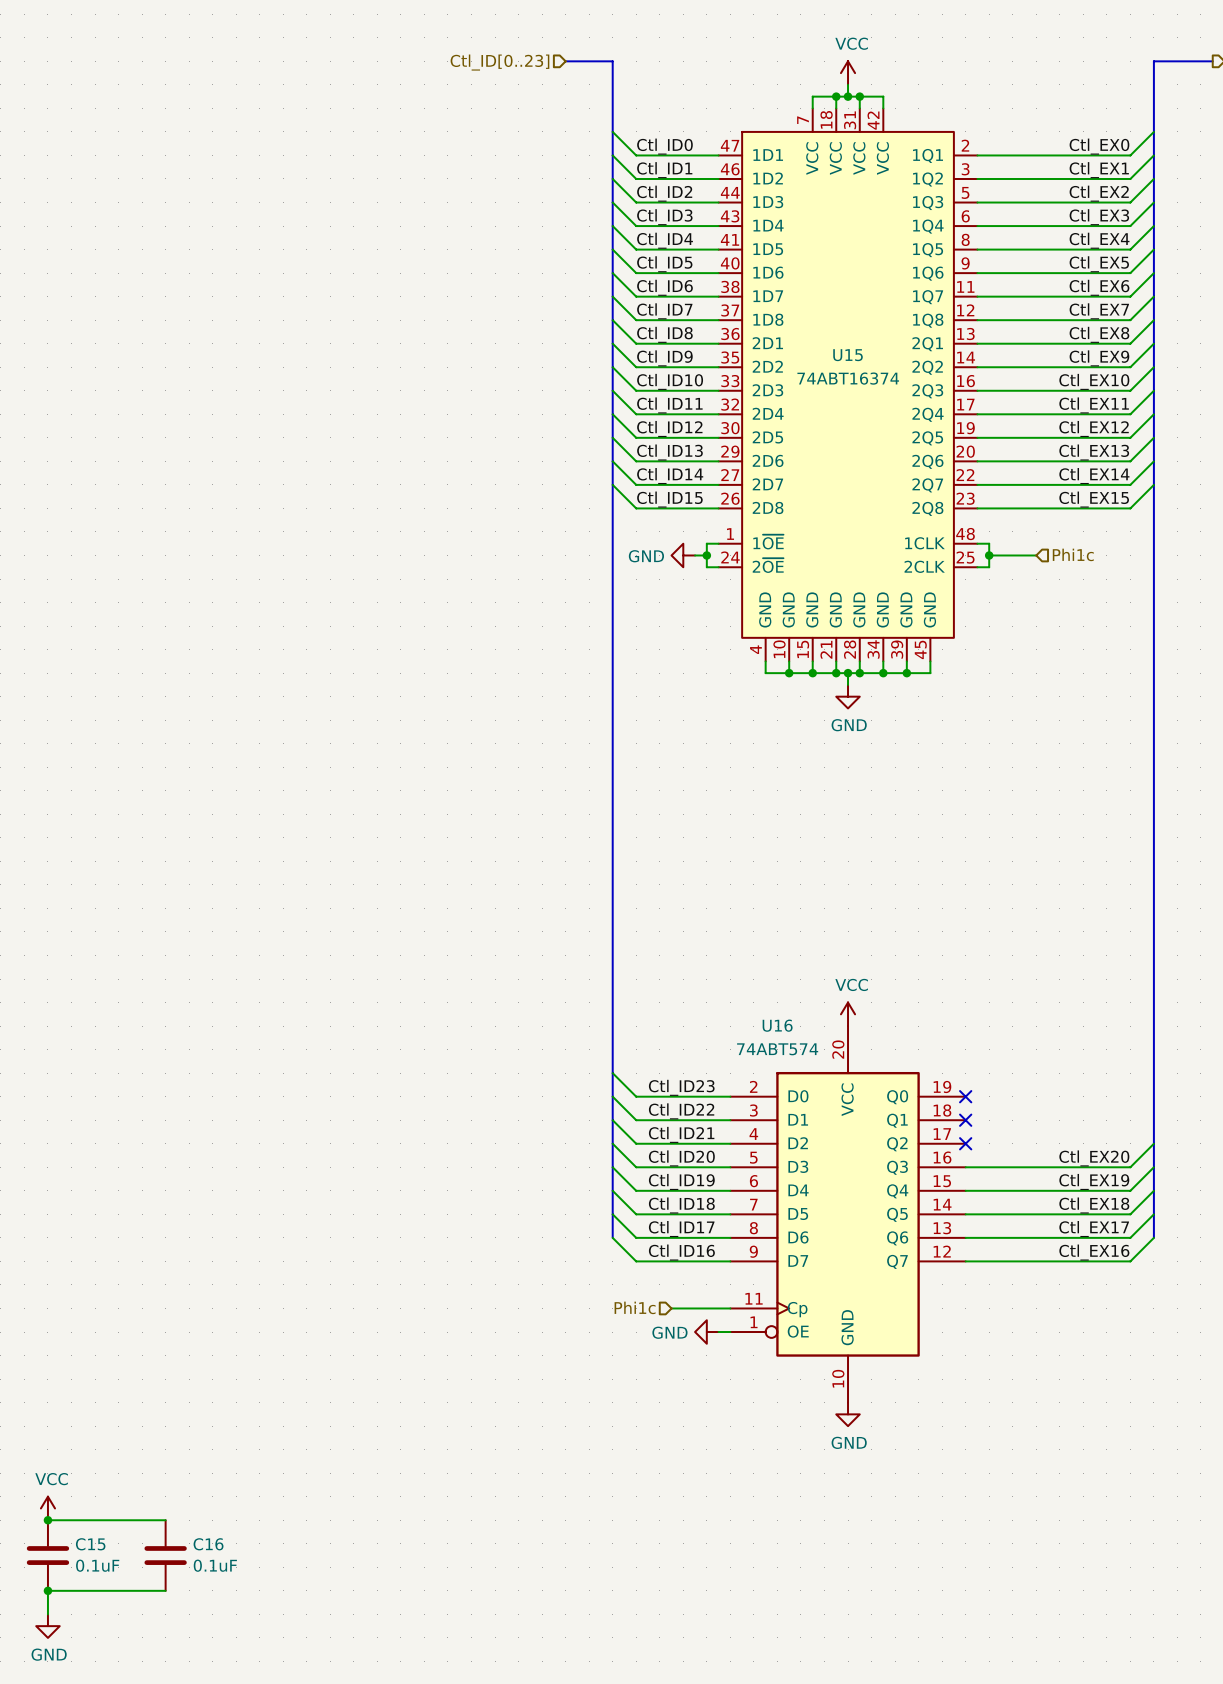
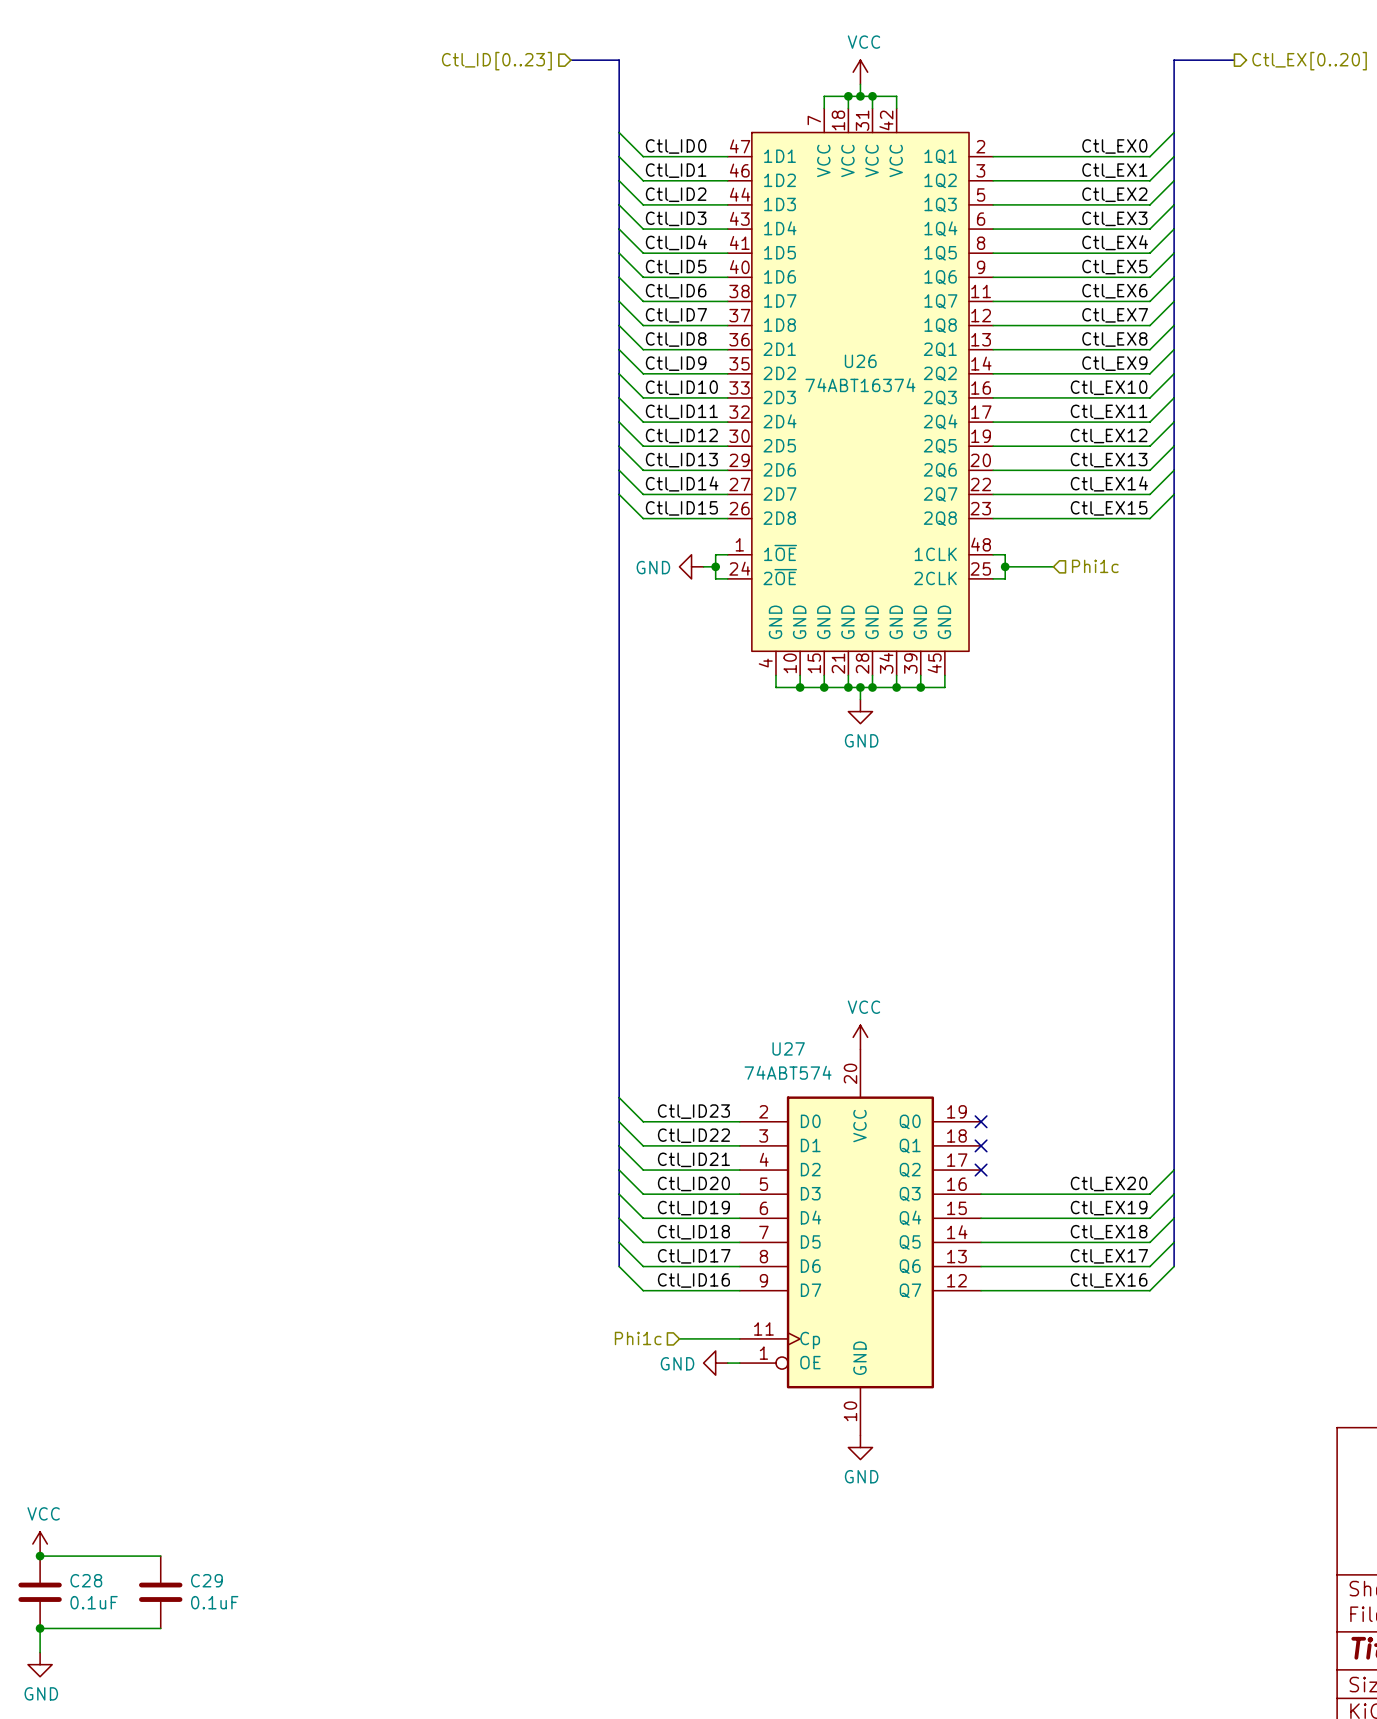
U15 name: U15 (848, 355) -> U26 (860, 361)
U16 name: U16 (777, 1025) -> U27 (788, 1048)
C15 name: C15 (90, 1544) -> C28 (86, 1580)
C16 name: C16 (208, 1544) -> C29 (206, 1580)

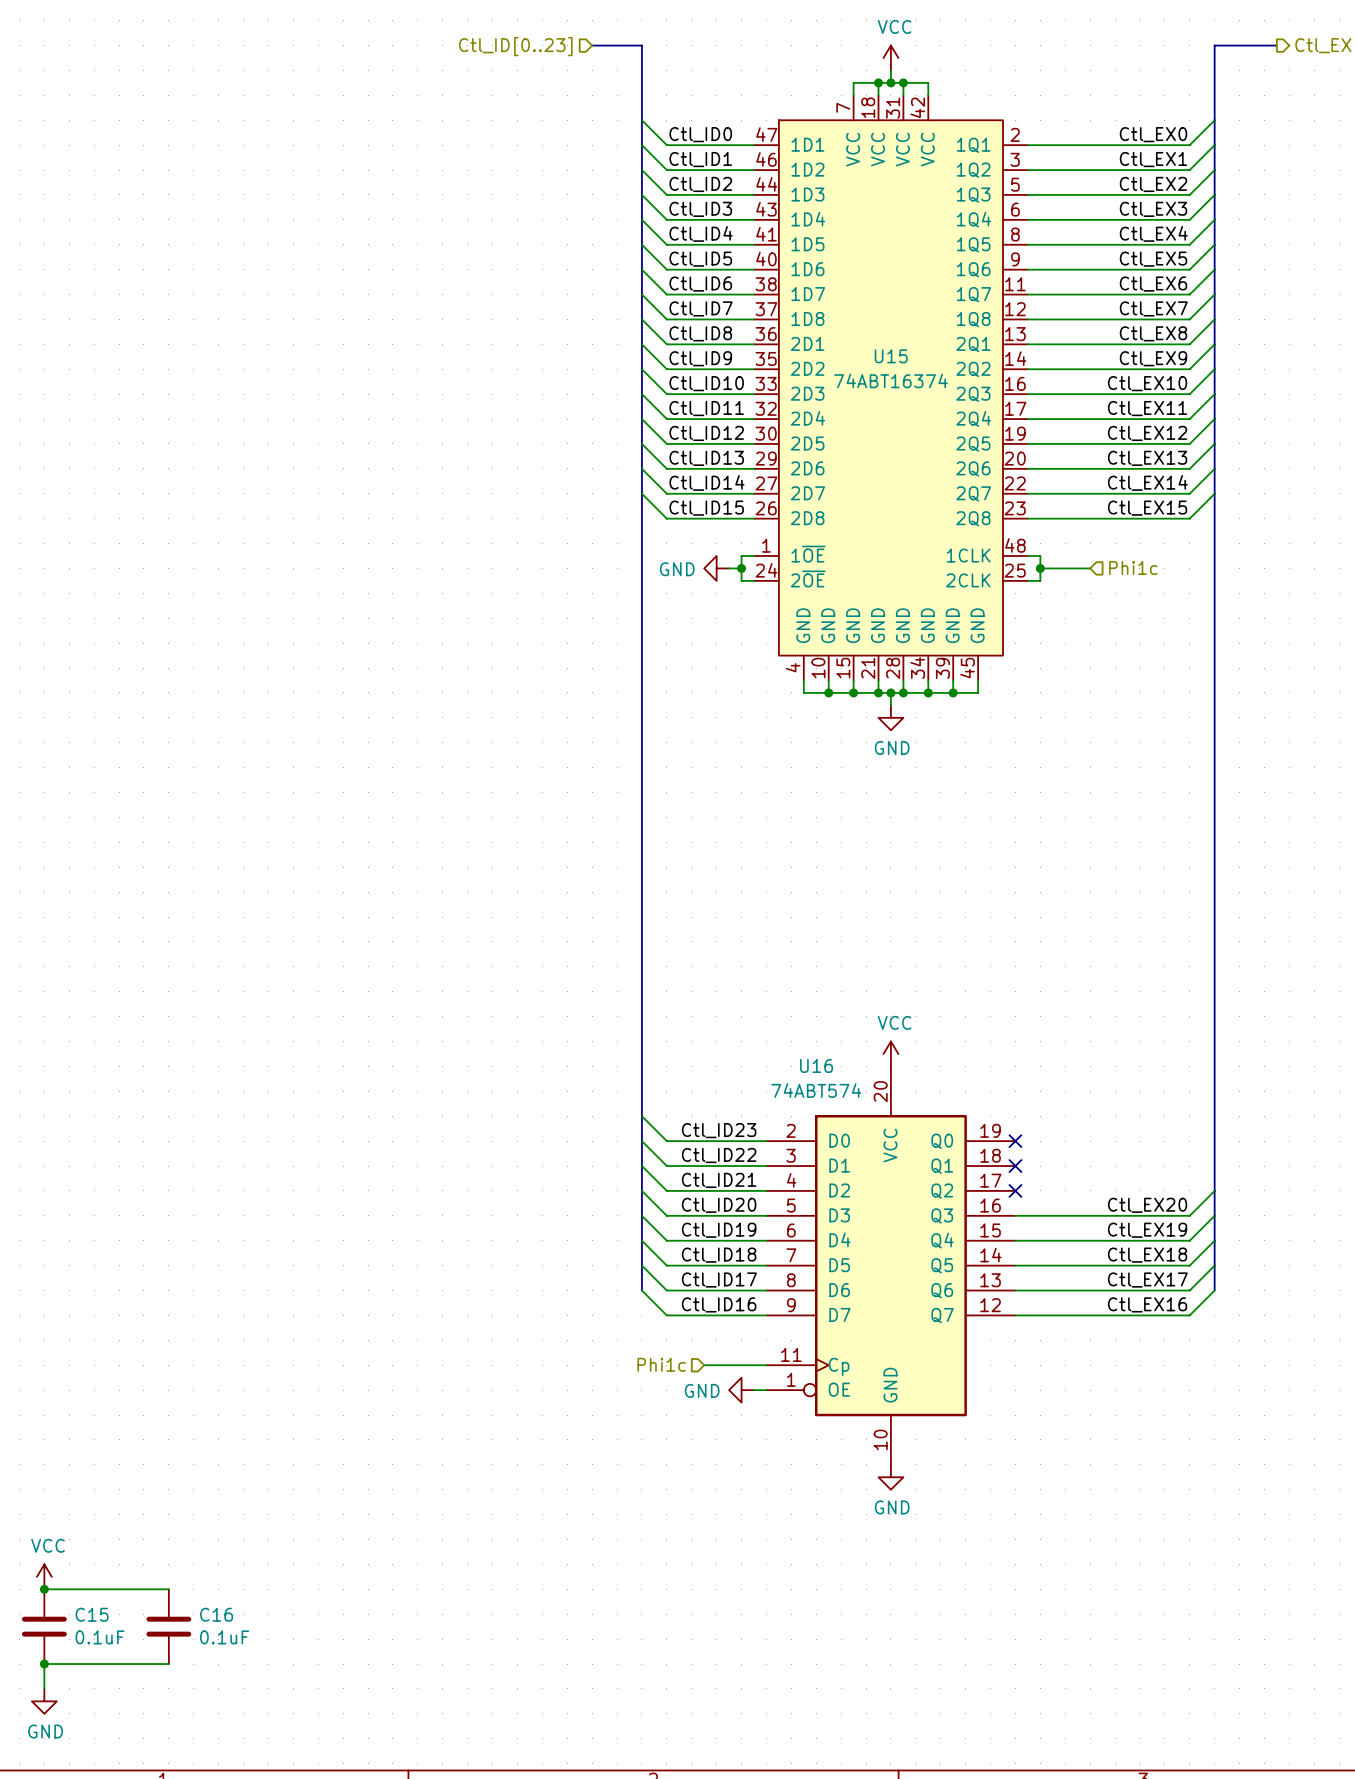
U26 name: U26 (860, 361) -> U15 (891, 356)
U27 name: U27 (788, 1048) -> U16 (816, 1065)
C28 name: C28 (86, 1580) -> C15 (92, 1614)
C29 name: C29 (206, 1580) -> C16 (216, 1614)

